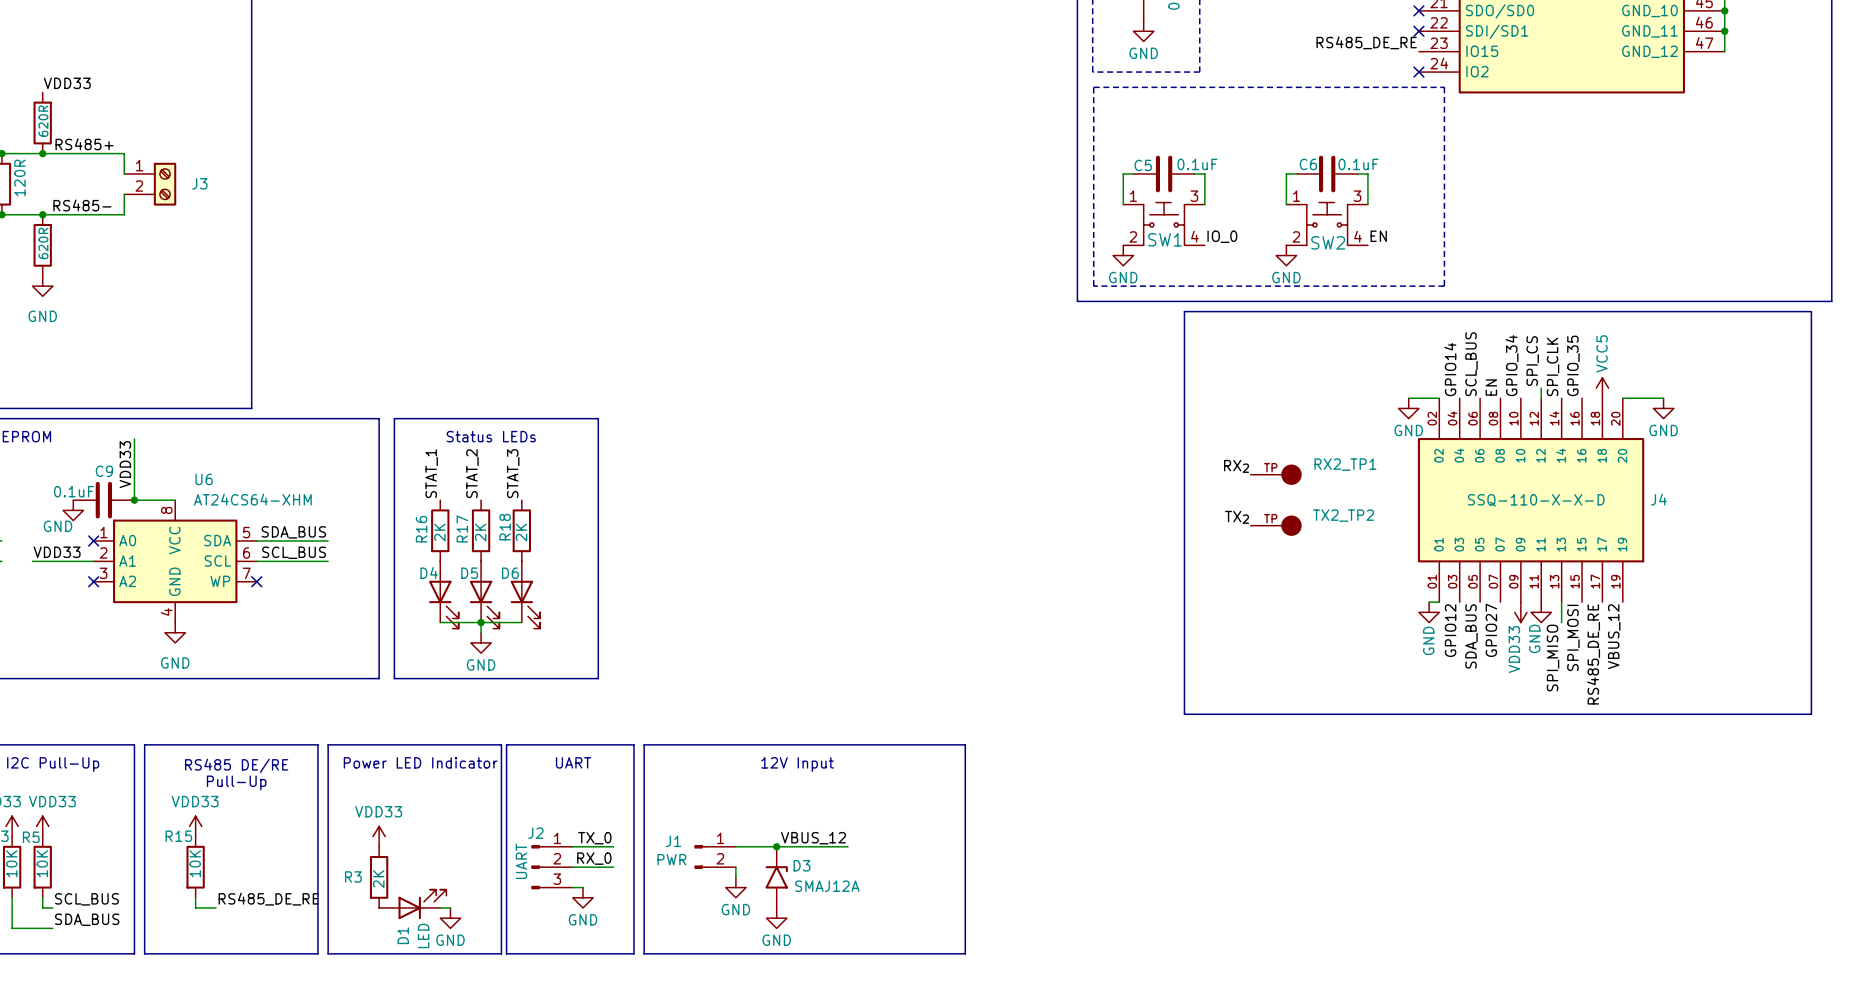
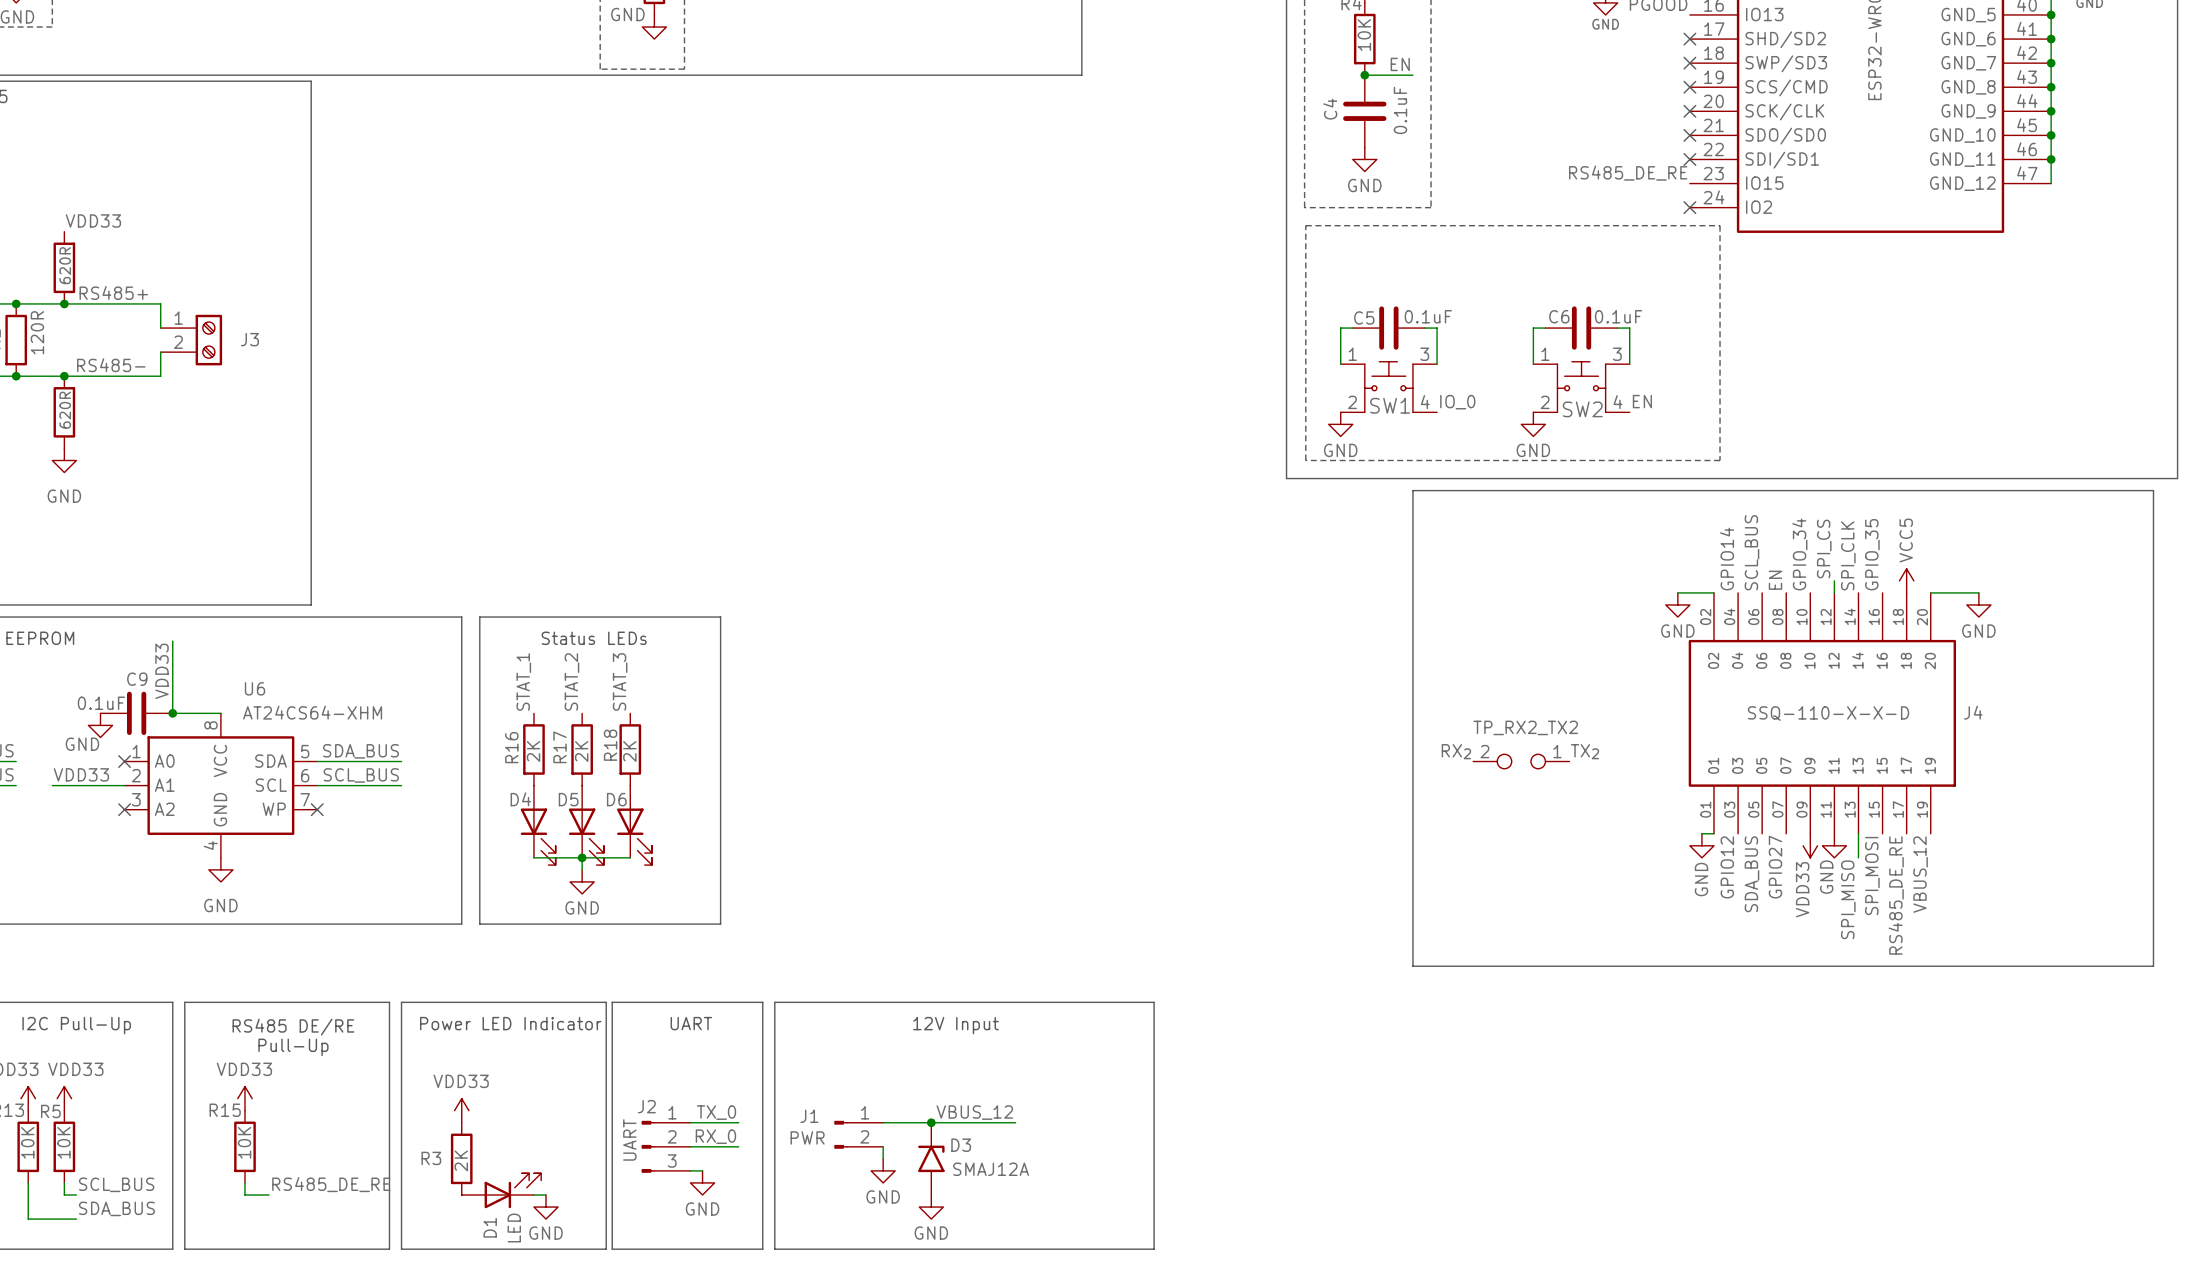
label position: RX2 (1236, 466) -> RX2 (1456, 751)
RX2_TP1: (1276, 474) -> none
label position: TX2 (1237, 517) -> TX2 (1585, 751)
TX2_TP2: (1276, 525) -> none
TP_RX2_TX2: none -> (1521, 761)

